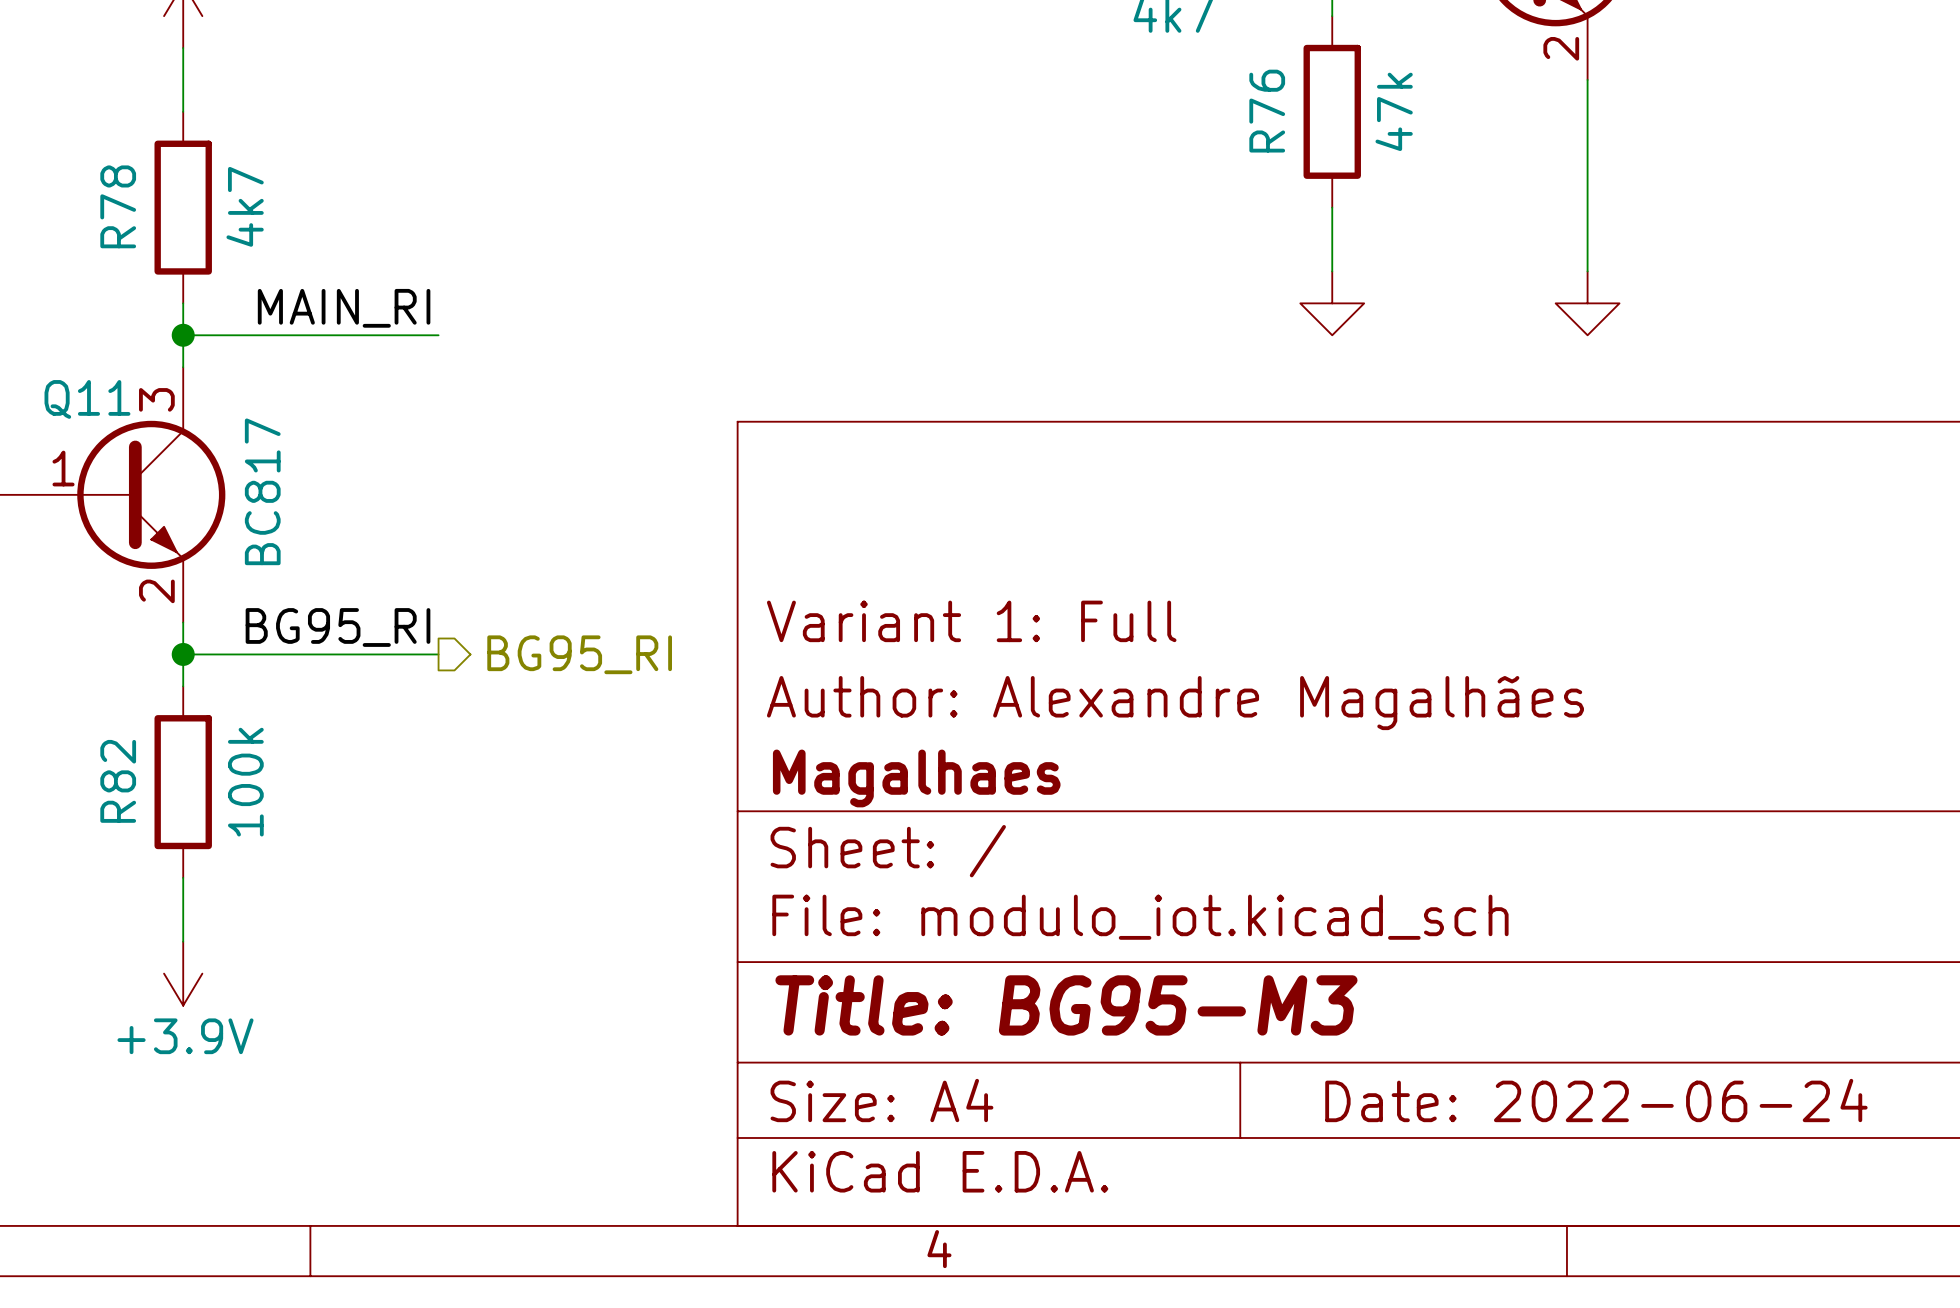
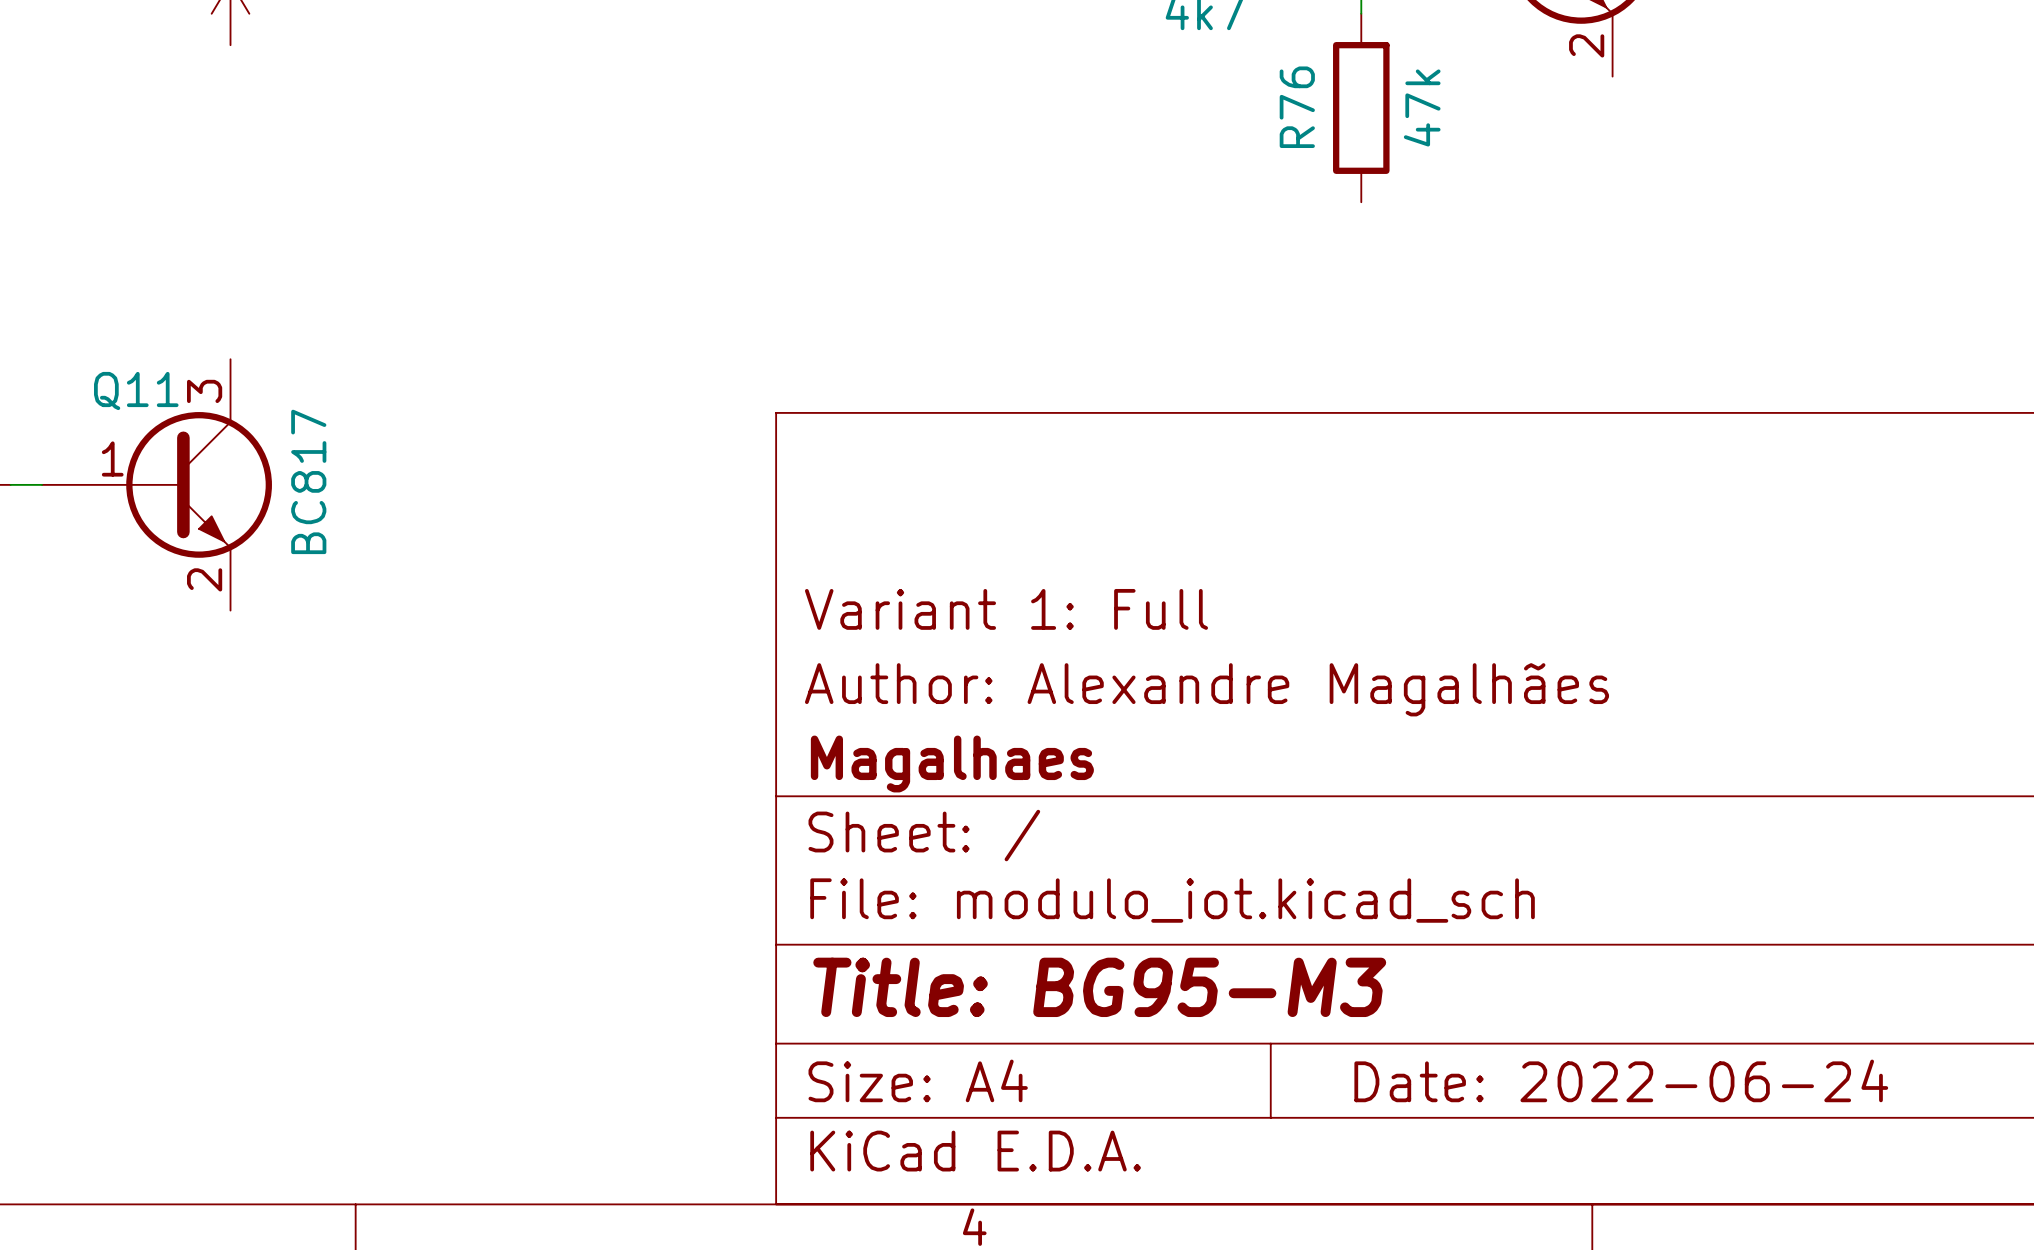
wire: (183, 48) (183, 111) -> none
wire: (1587, 79) (1587, 271) -> none
R78: 4k7 (183, 207) -> none
wire: (1332, 207) (1332, 271) -> none
wire: (183, 303) (183, 367) -> none
power symbol: (1332, 303) -> none
power symbol: (1587, 303) -> none
label: MAIN_RI (344, 308) -> none
wire: (183, 335) (438, 335) -> none
junction: (183, 335) -> none
wire: (183, 622) (183, 686) -> none
label: BG95_RI (338, 627) -> none
wire: (183, 654) (438, 654) -> none
junction: (183, 654) -> none
hierarchical label: BG95_RI (579, 654) -> none
R82: 100k (183, 782) -> none
wire: (183, 877) (183, 941) -> none
power symbol: +3.9V (183, 973) -> none

